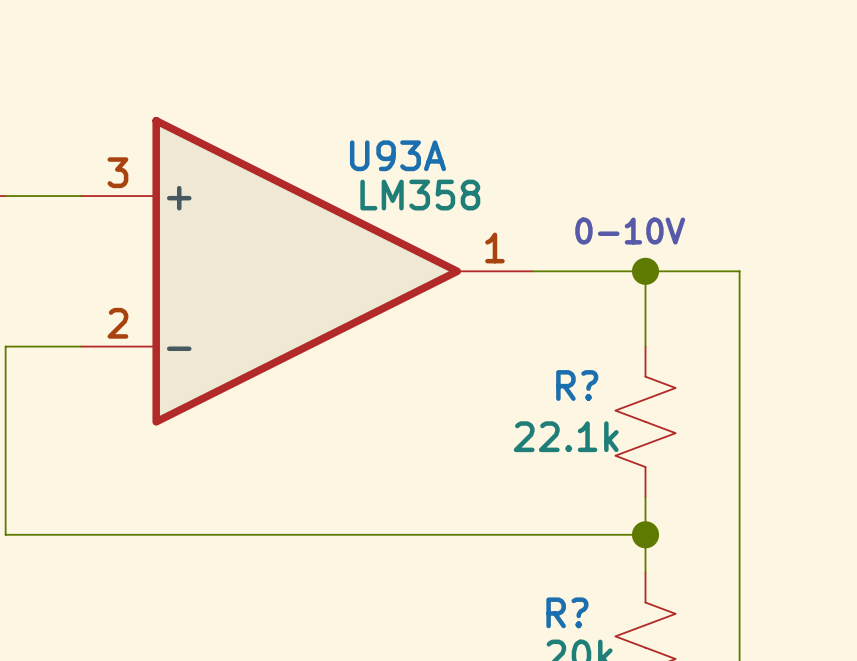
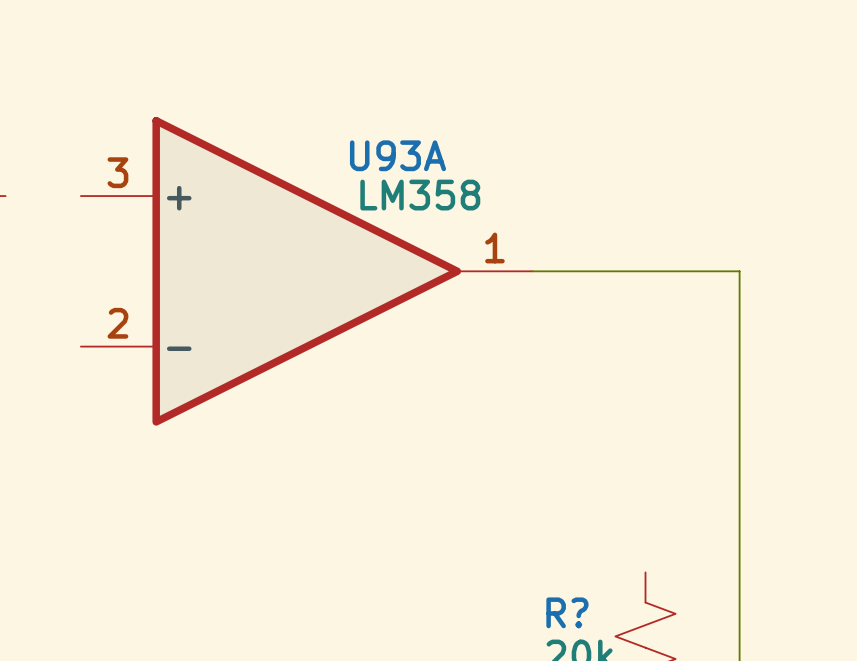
wire: (5, 196) (80, 196) -> none
text: 0-10V (630, 231) -> none
wire: (645, 271) (645, 346) -> none
junction: (645, 271) -> none
wire: (80, 346) (5, 346) (5, 534) (645, 534) -> none
R?: 22.1k (645, 421) -> none
wire: (645, 497) (645, 572) -> none
junction: (645, 534) -> none

